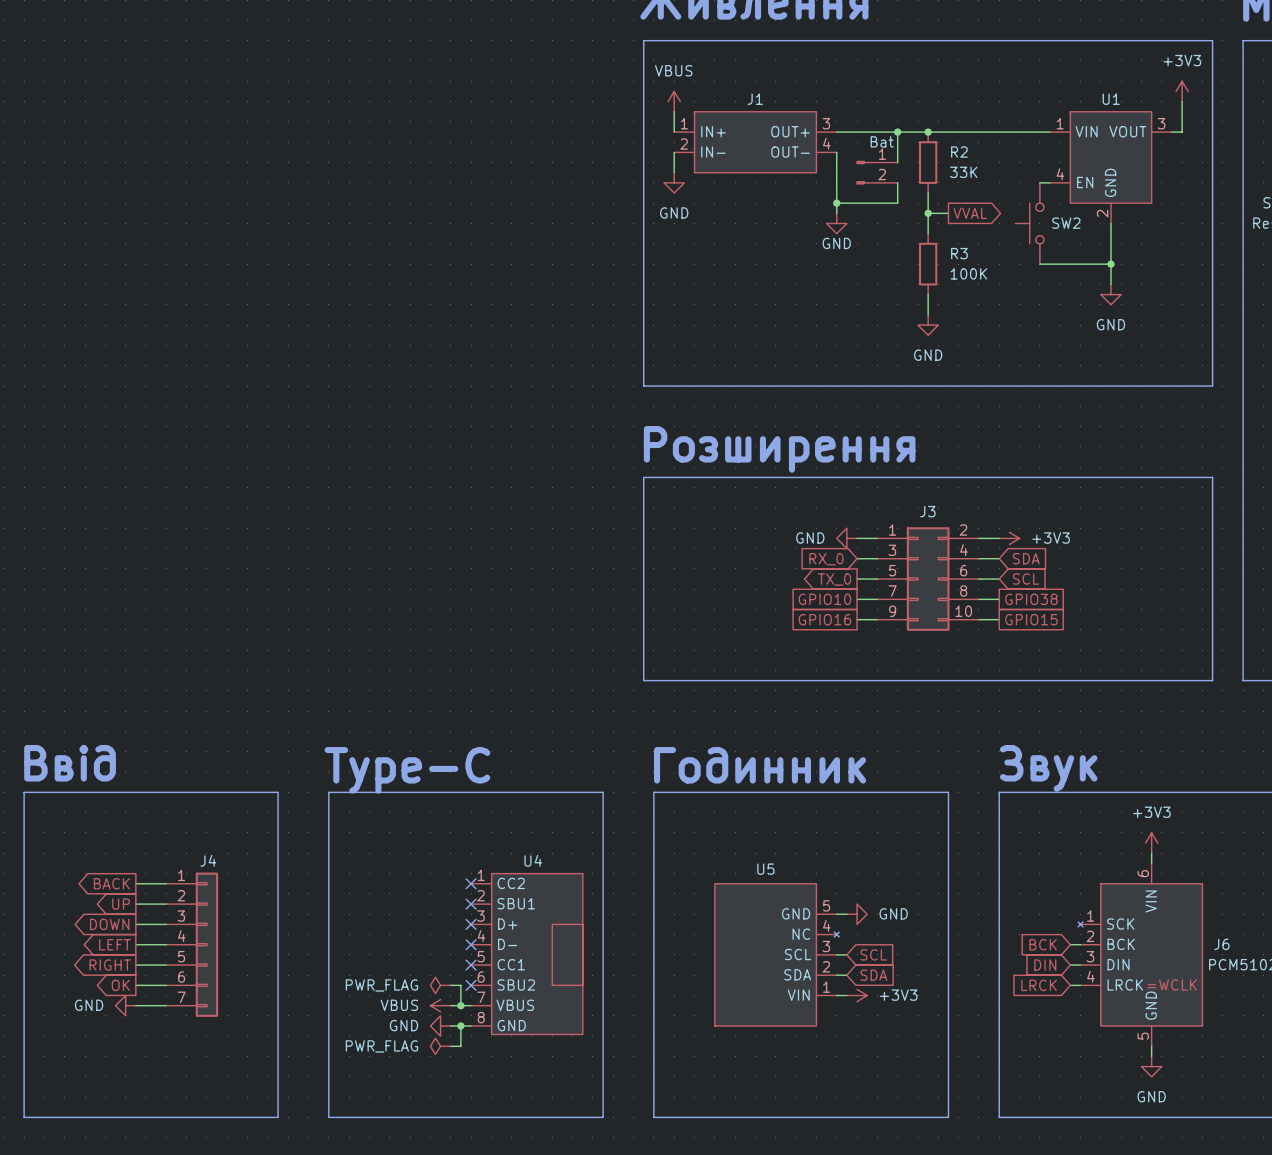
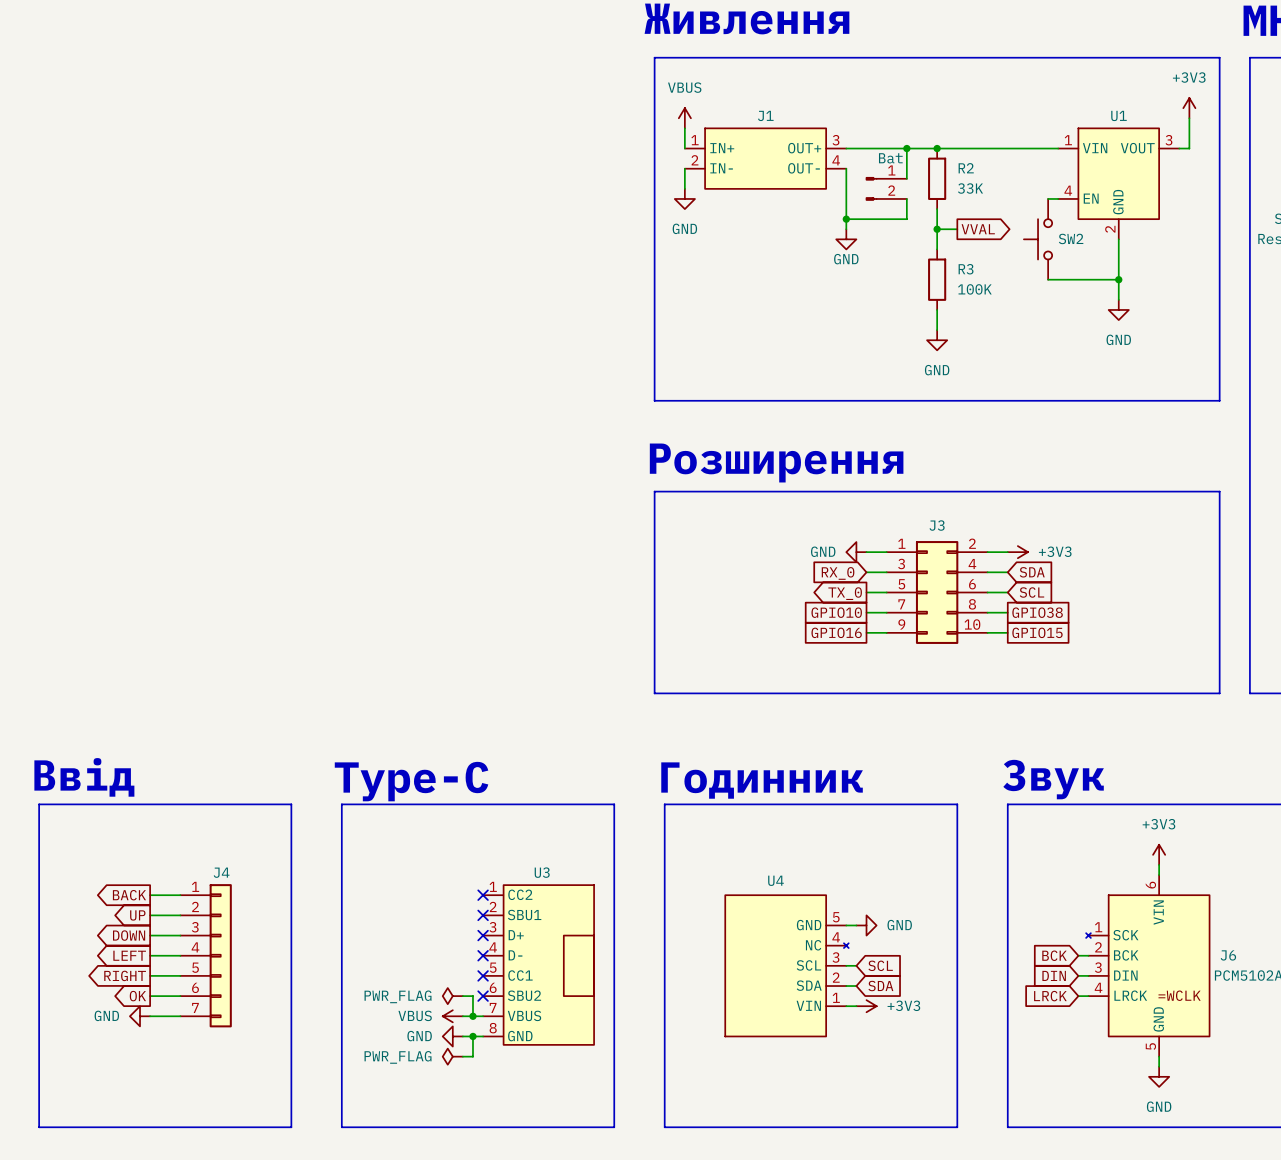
U4 name: U4 (533, 860) -> U3 (542, 872)
U5 name: U5 (765, 869) -> U4 (775, 880)

